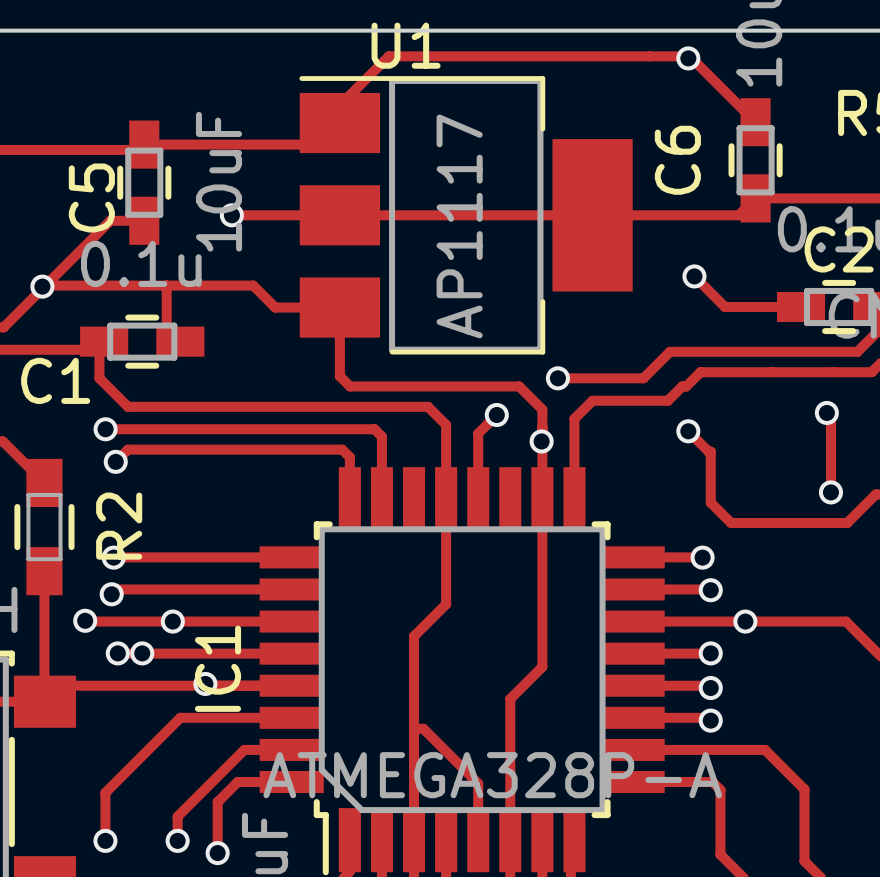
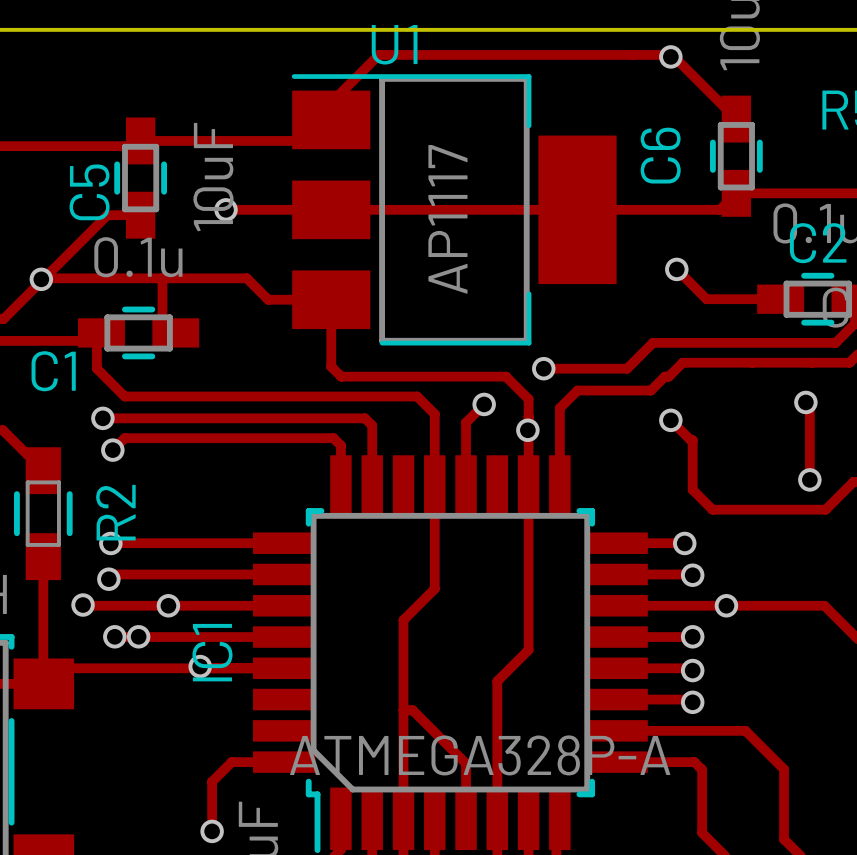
track: (291, 717) (180, 717) (105, 792) (105, 840) -> none
track: (291, 749) (244, 749) (177, 816) (177, 840) -> none
via: (105, 840) -> none
via: (177, 840) -> none

